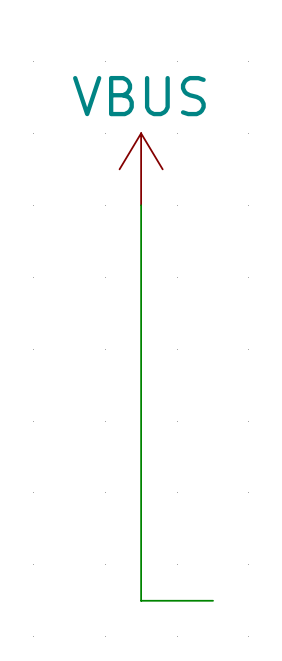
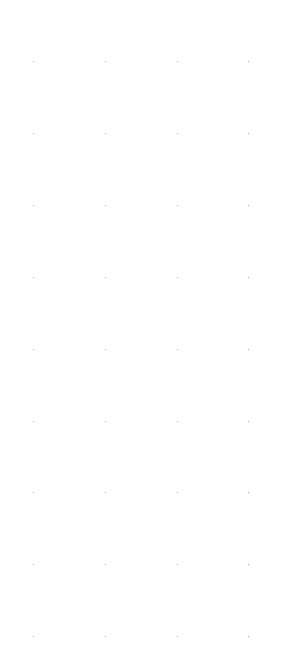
power symbol: VBUS (141, 169) -> none
wire: (141, 205) (141, 600) (213, 600) -> none

